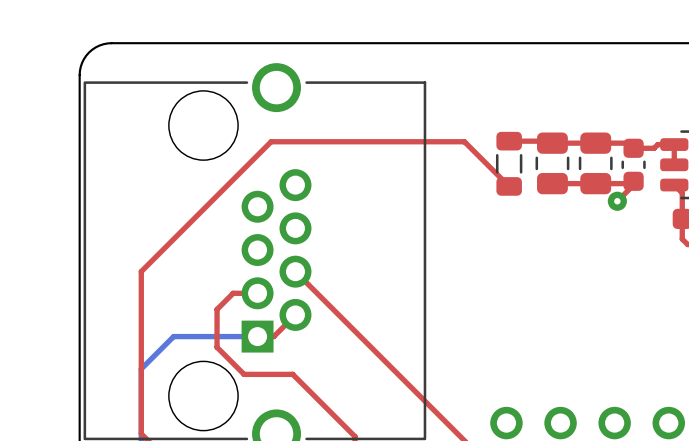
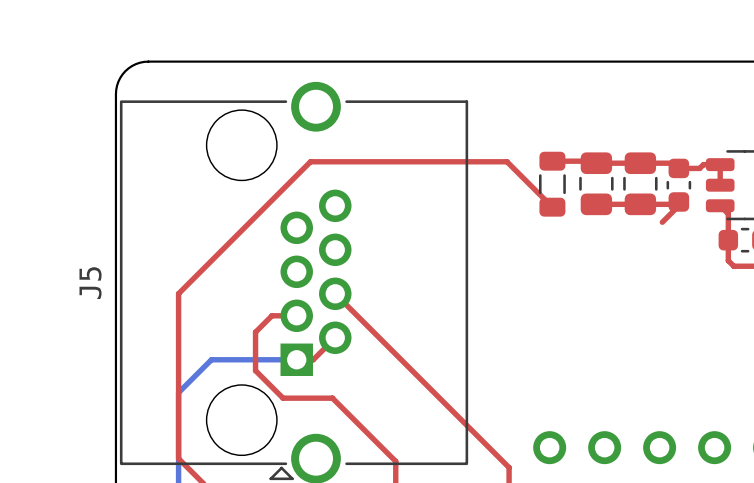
via: (617, 201) -> none
J5 name: none -> J5 (90, 283)

